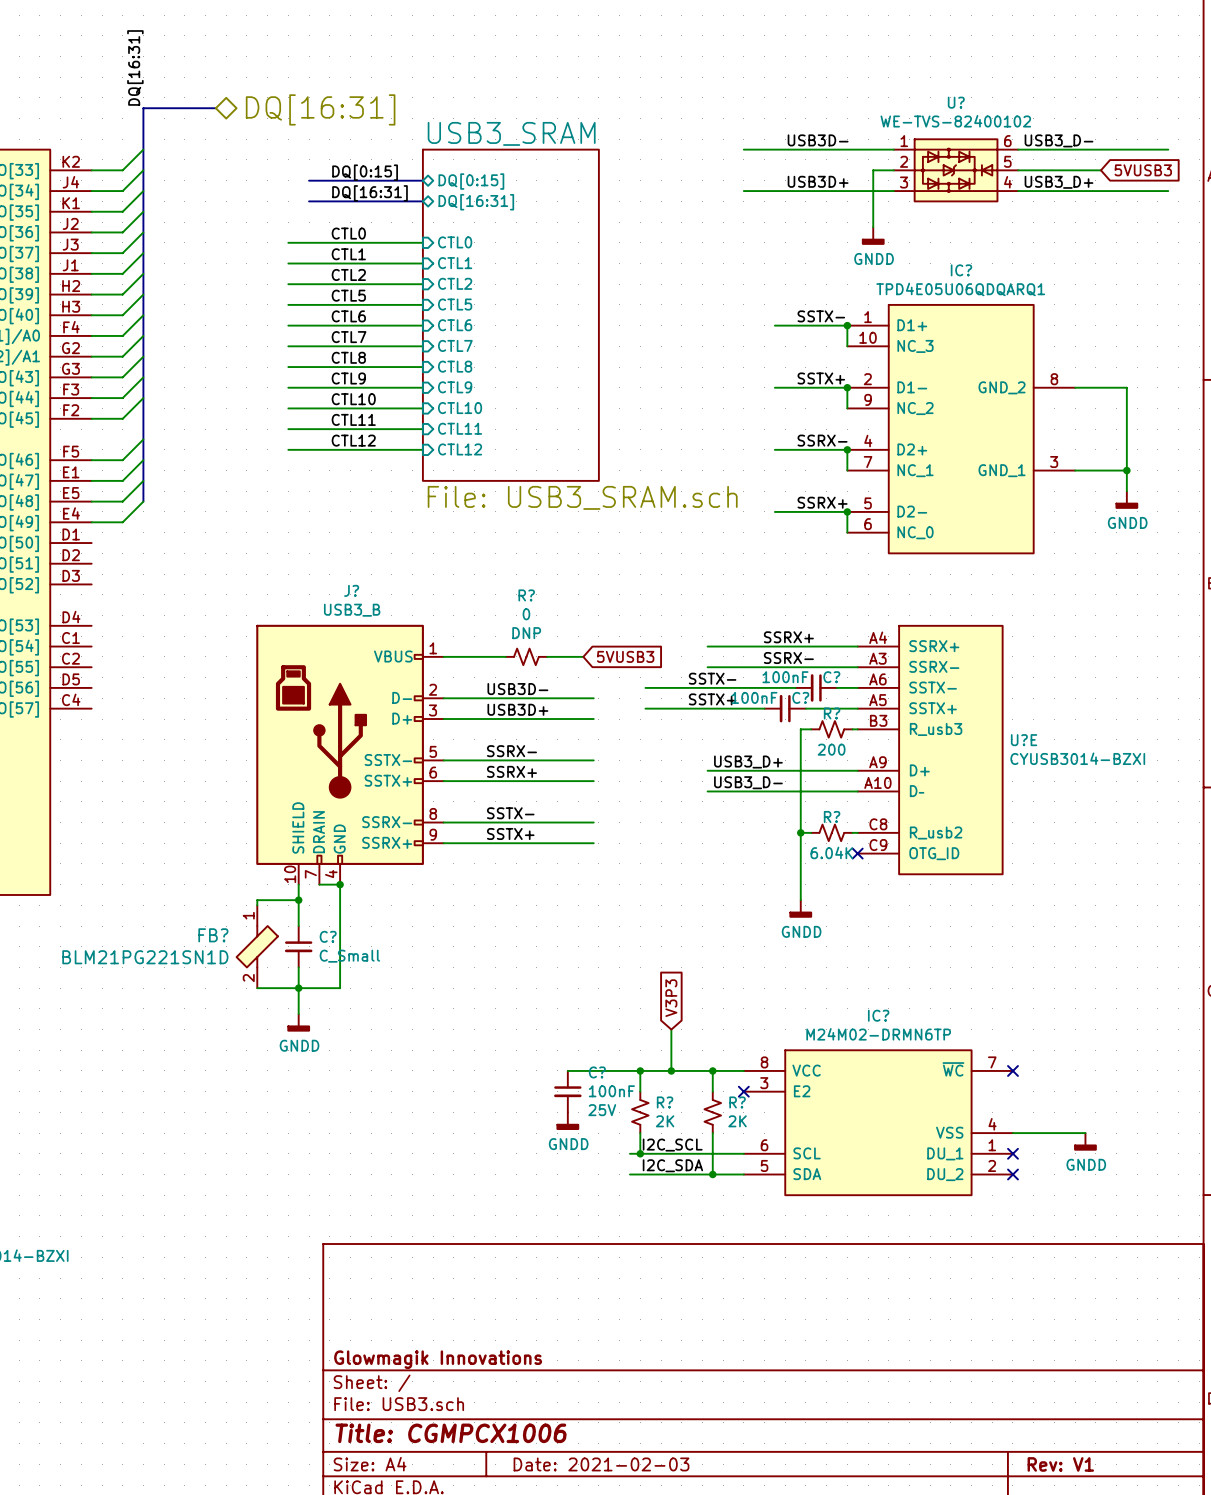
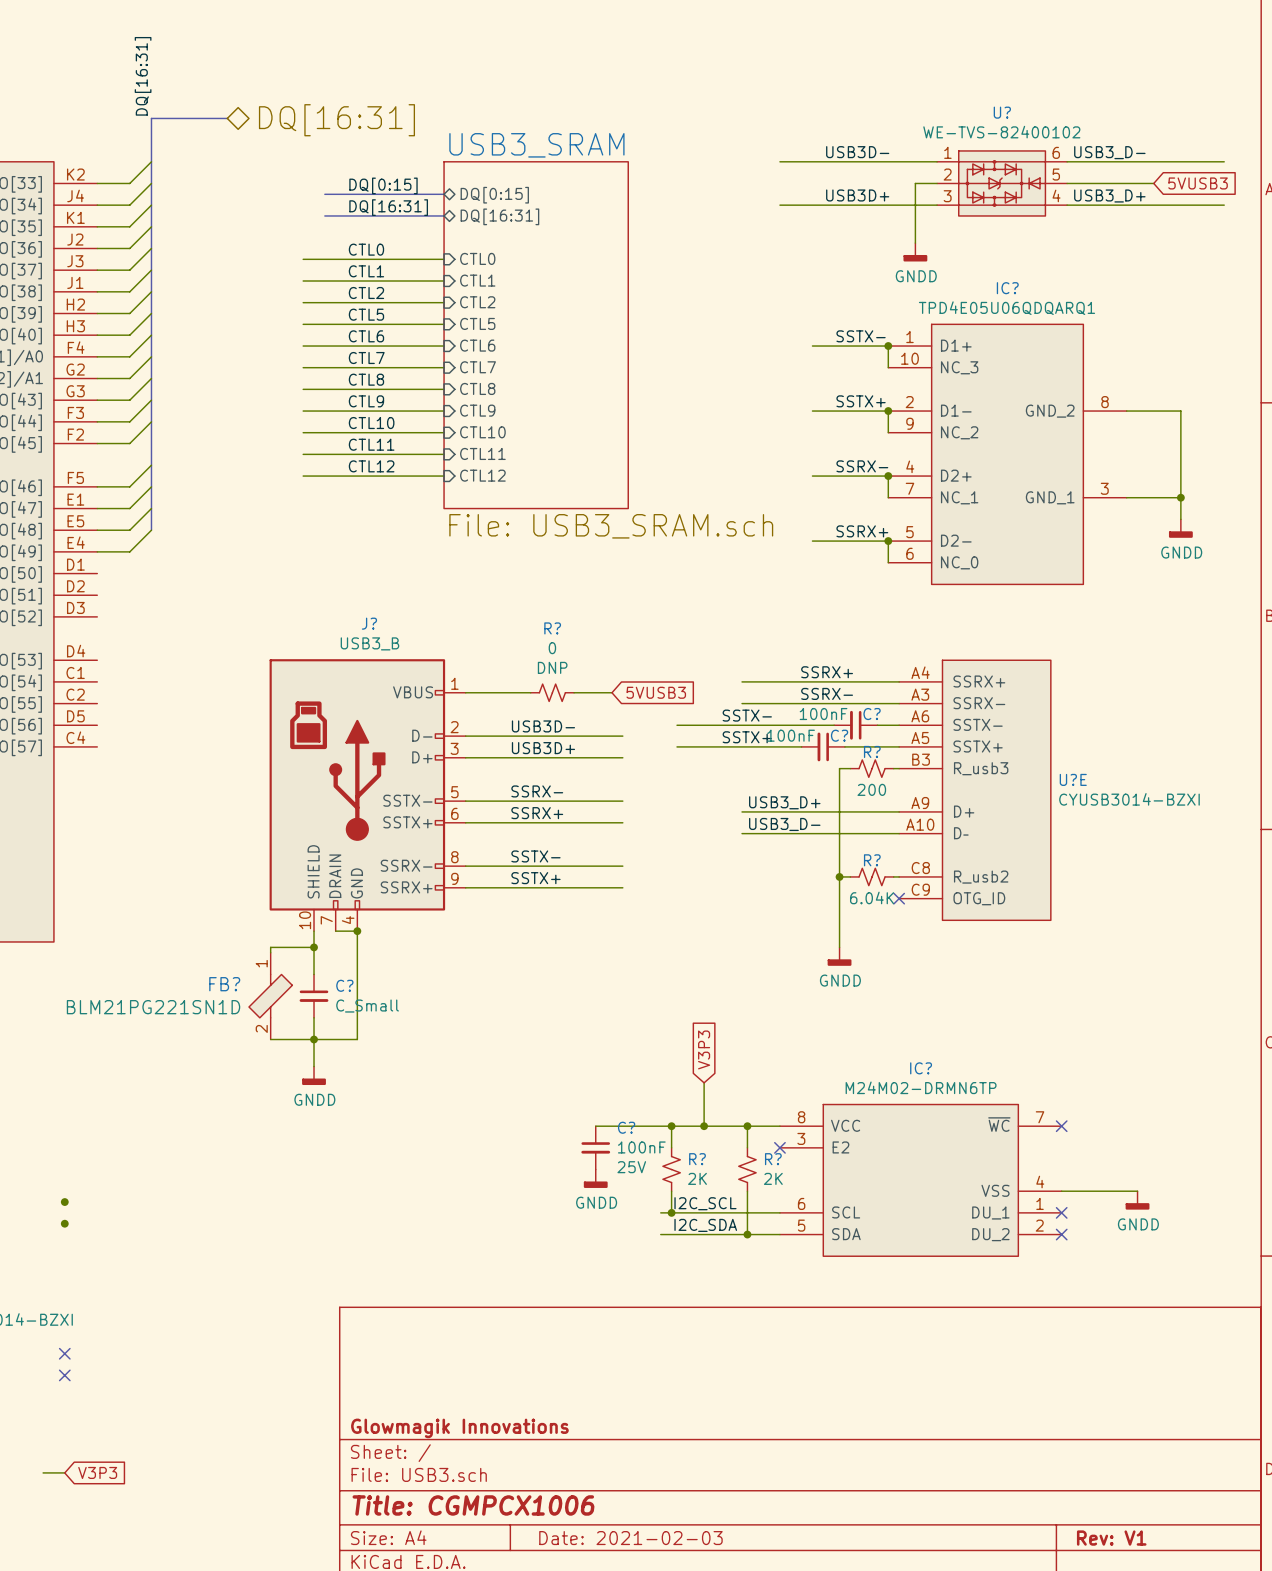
junction: none -> (64, 1202)
junction: none -> (64, 1223)
no-connect mark: none -> (64, 1353)
no-connect mark: none -> (64, 1375)
wire: none -> (43, 1472) (64, 1472)
global label: none -> V3P3 (97, 1472)

